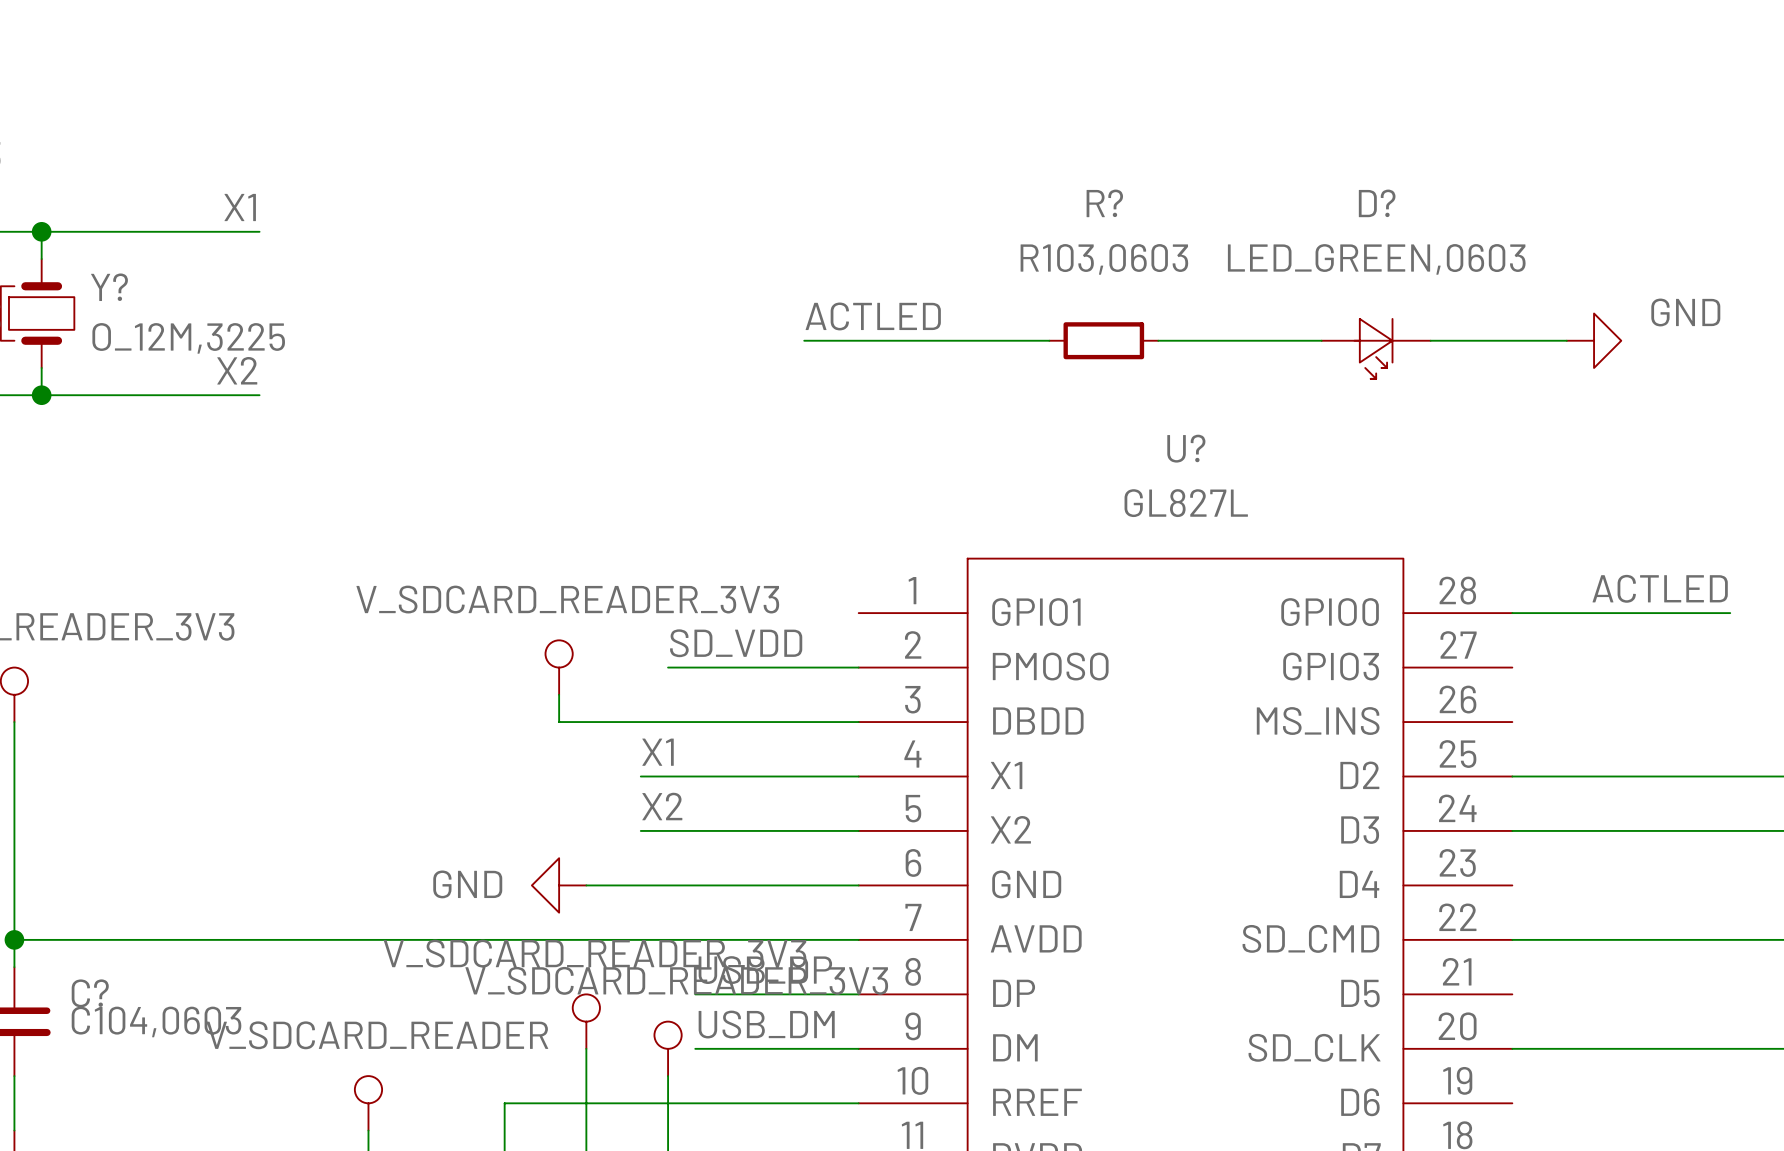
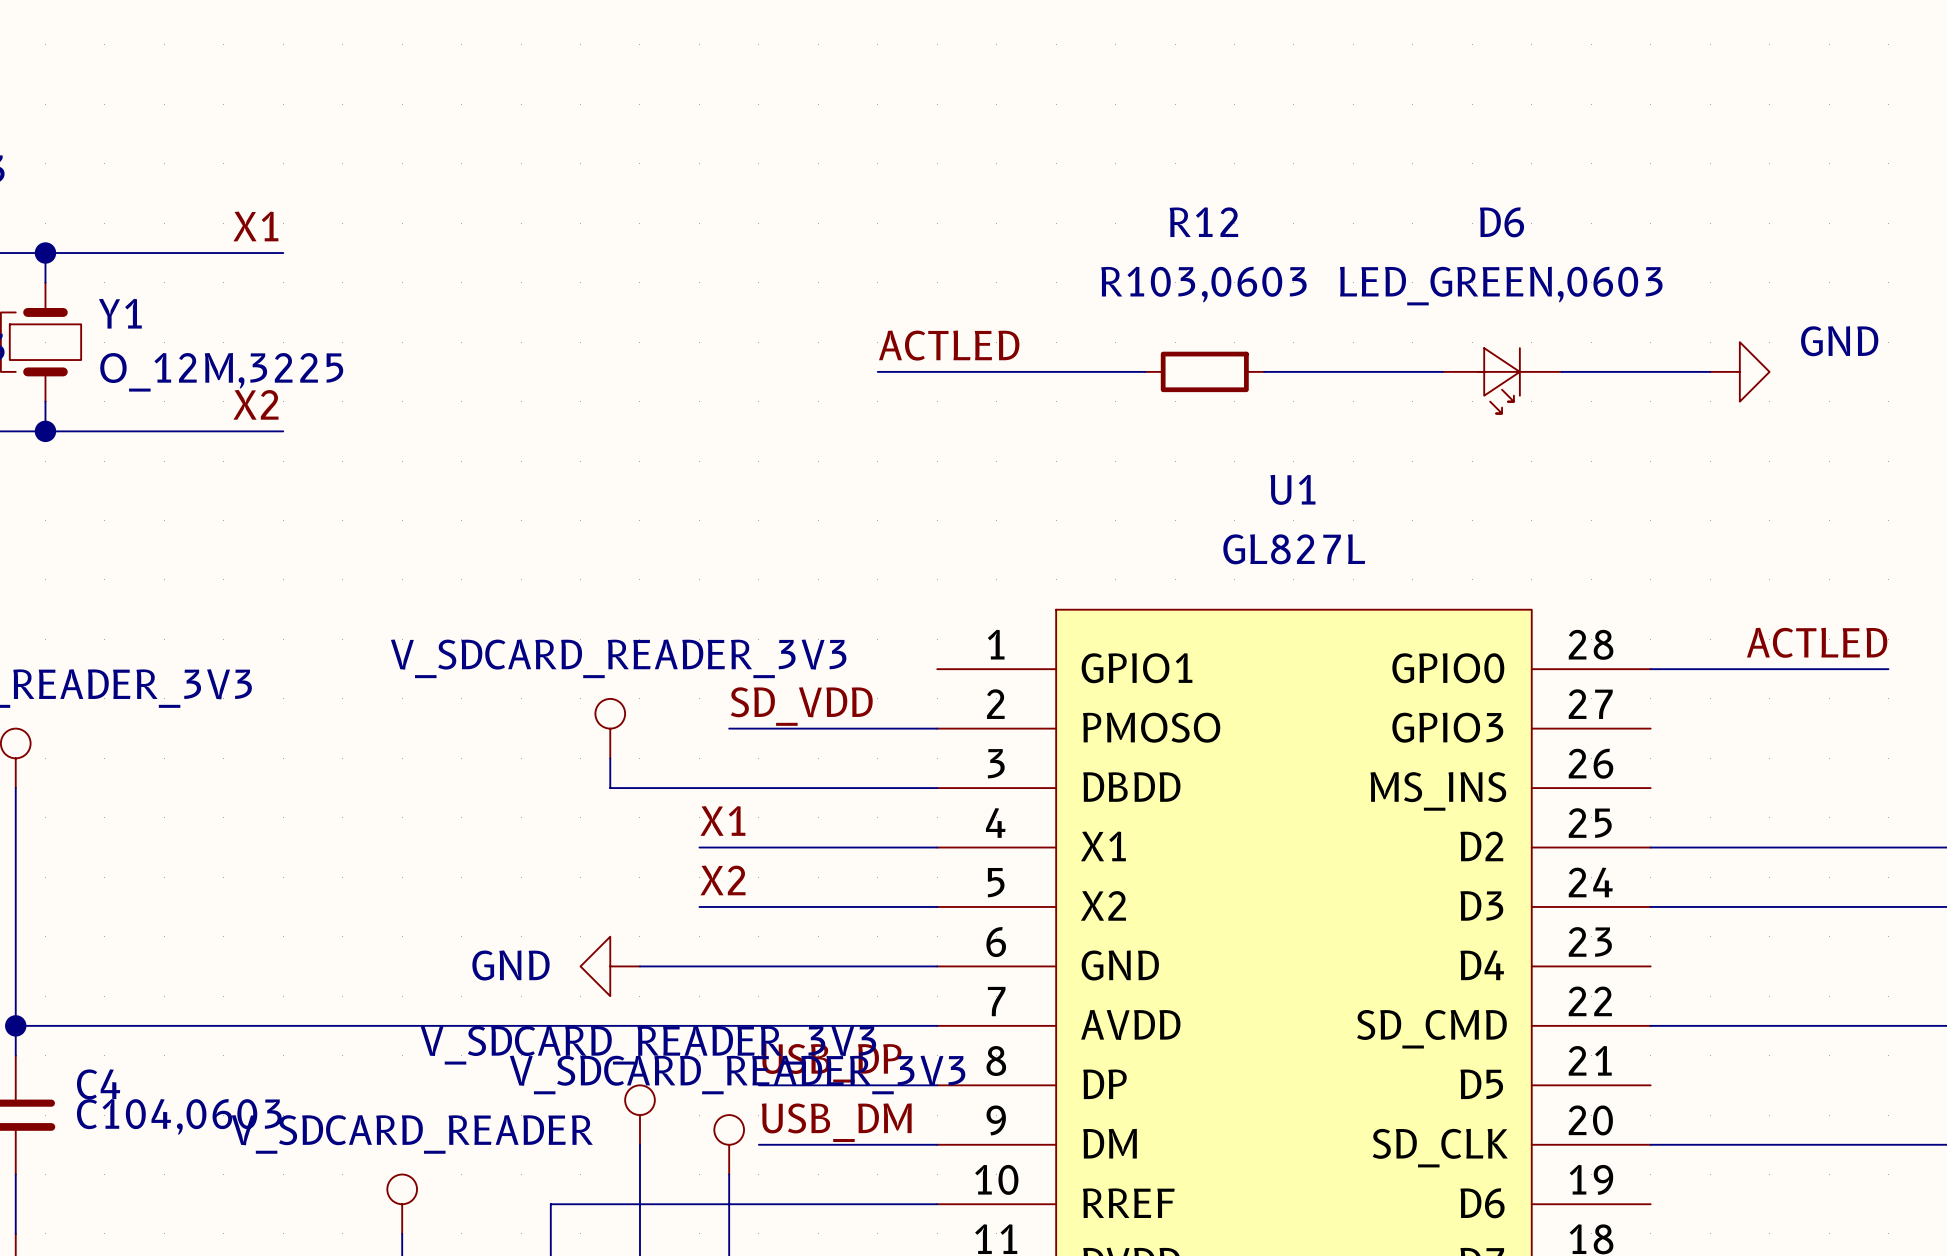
R? name: R? (1104, 203) -> R12 (1203, 222)
D? name: D? (1377, 203) -> D6 (1502, 222)
Y? name: Y? (109, 287) -> Y1 (120, 313)
U? name: U? (1186, 448) -> U1 (1292, 489)
C? name: C? (90, 993) -> C4 (98, 1084)

